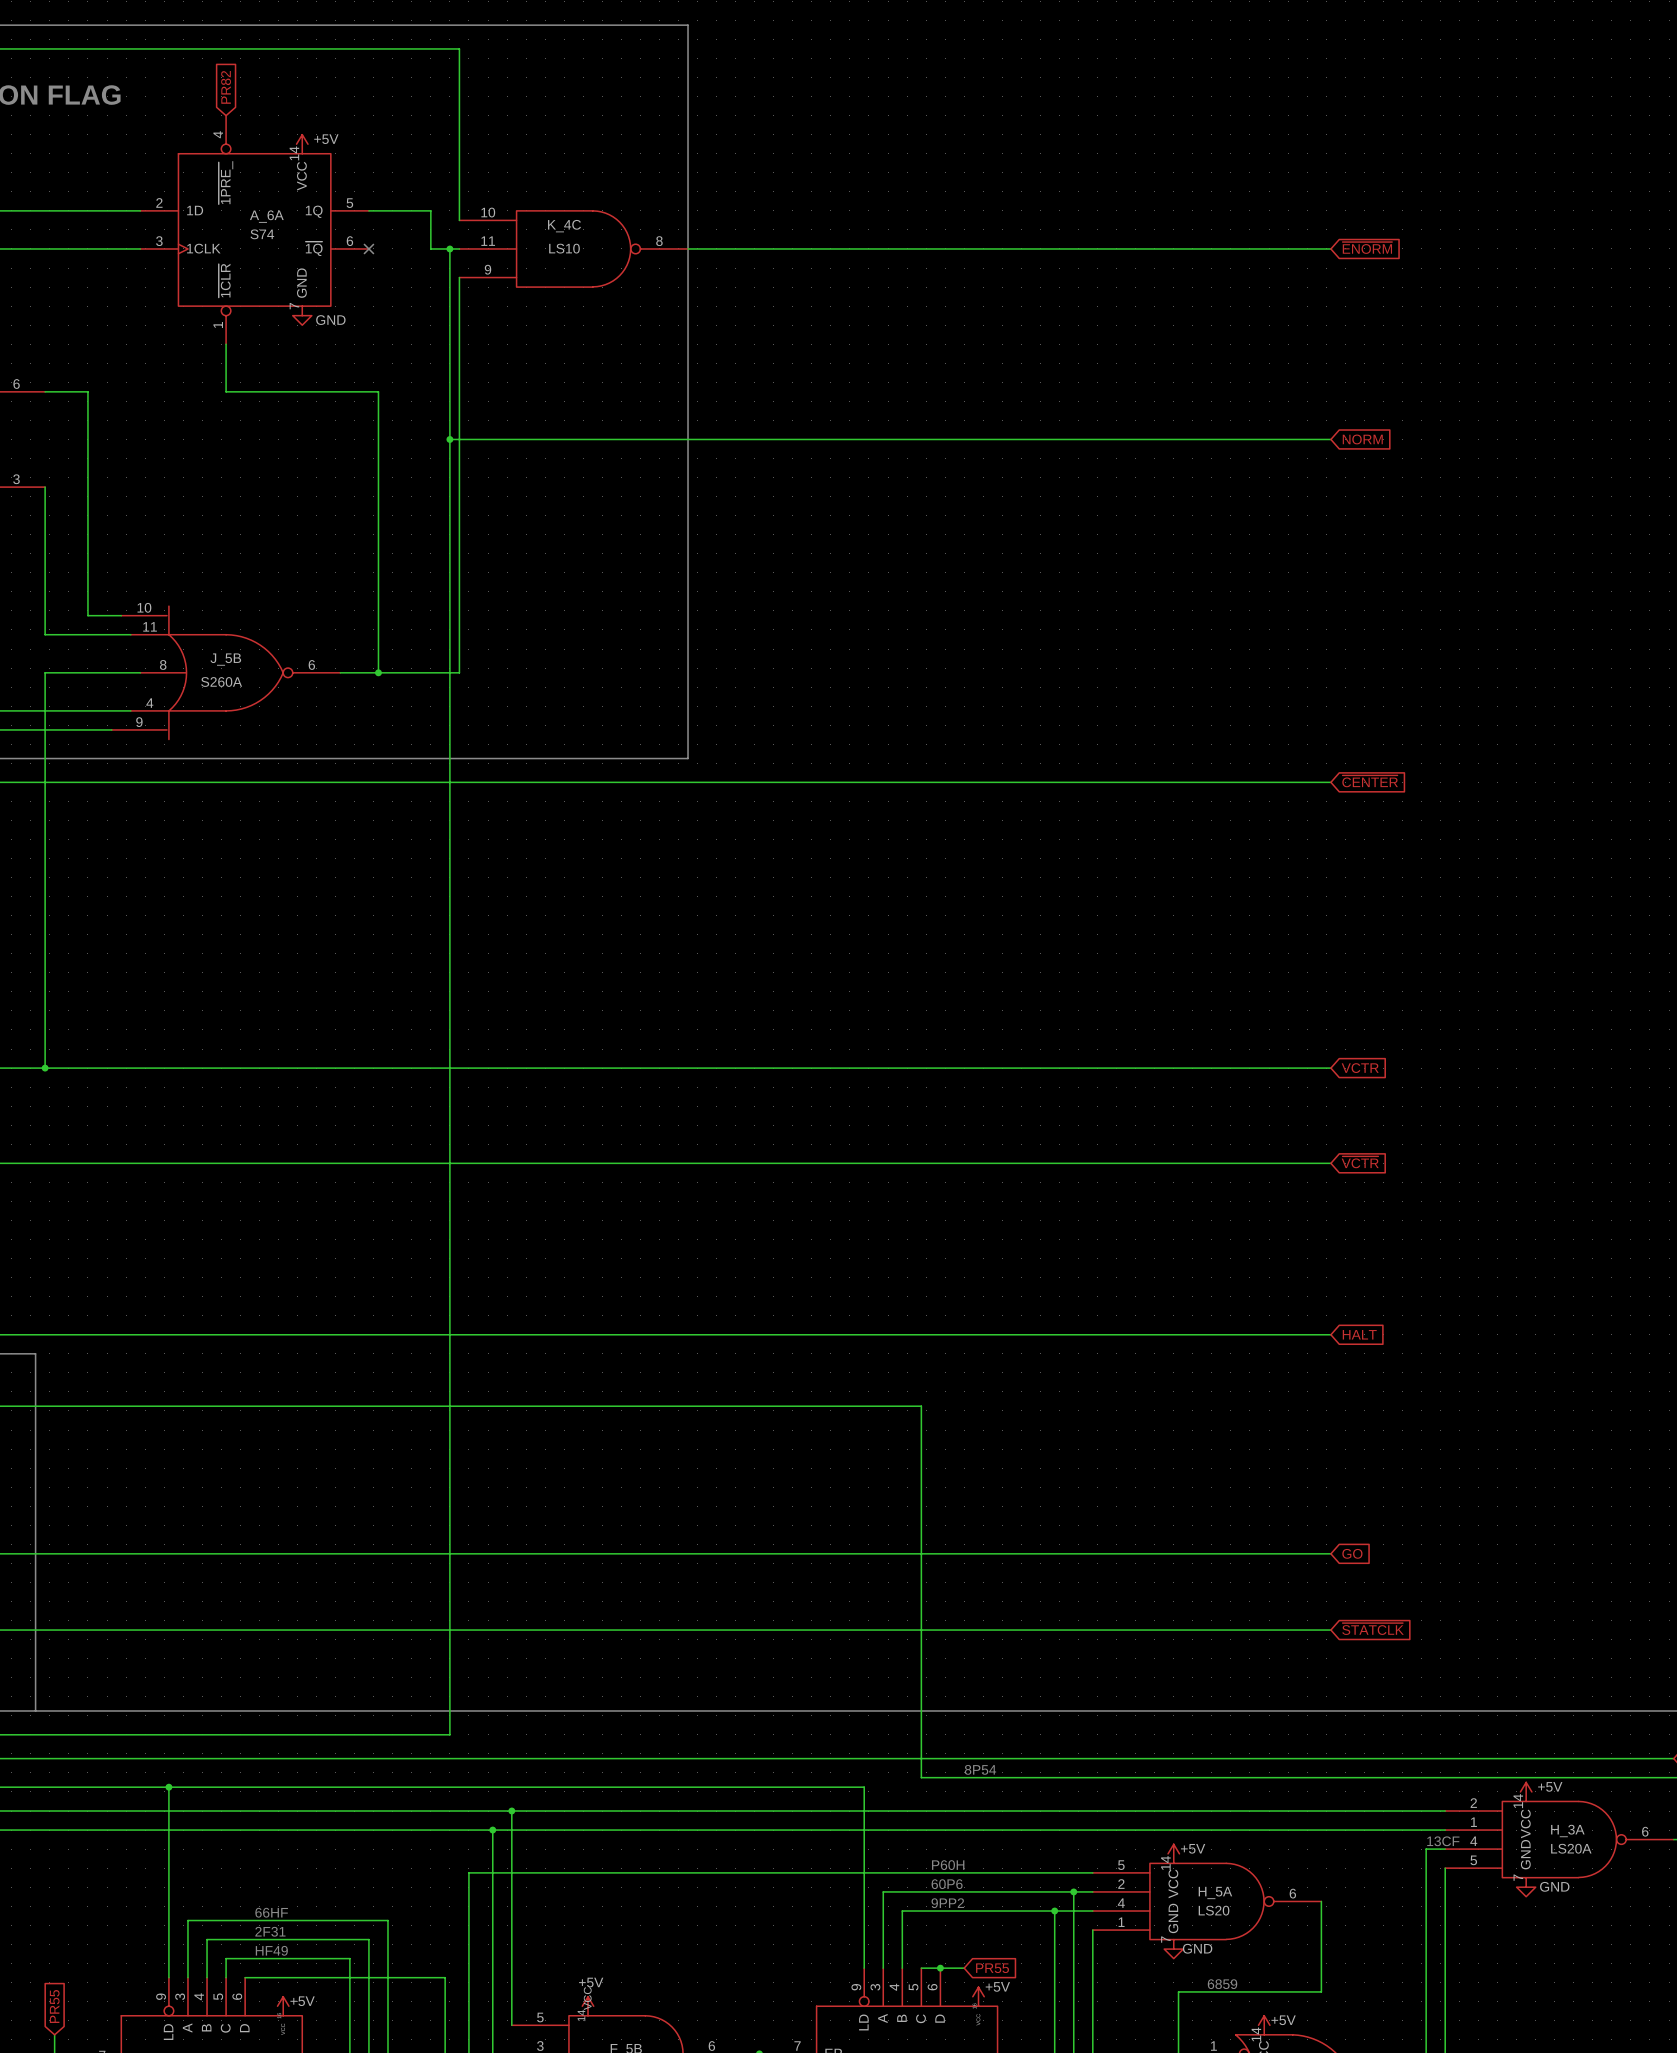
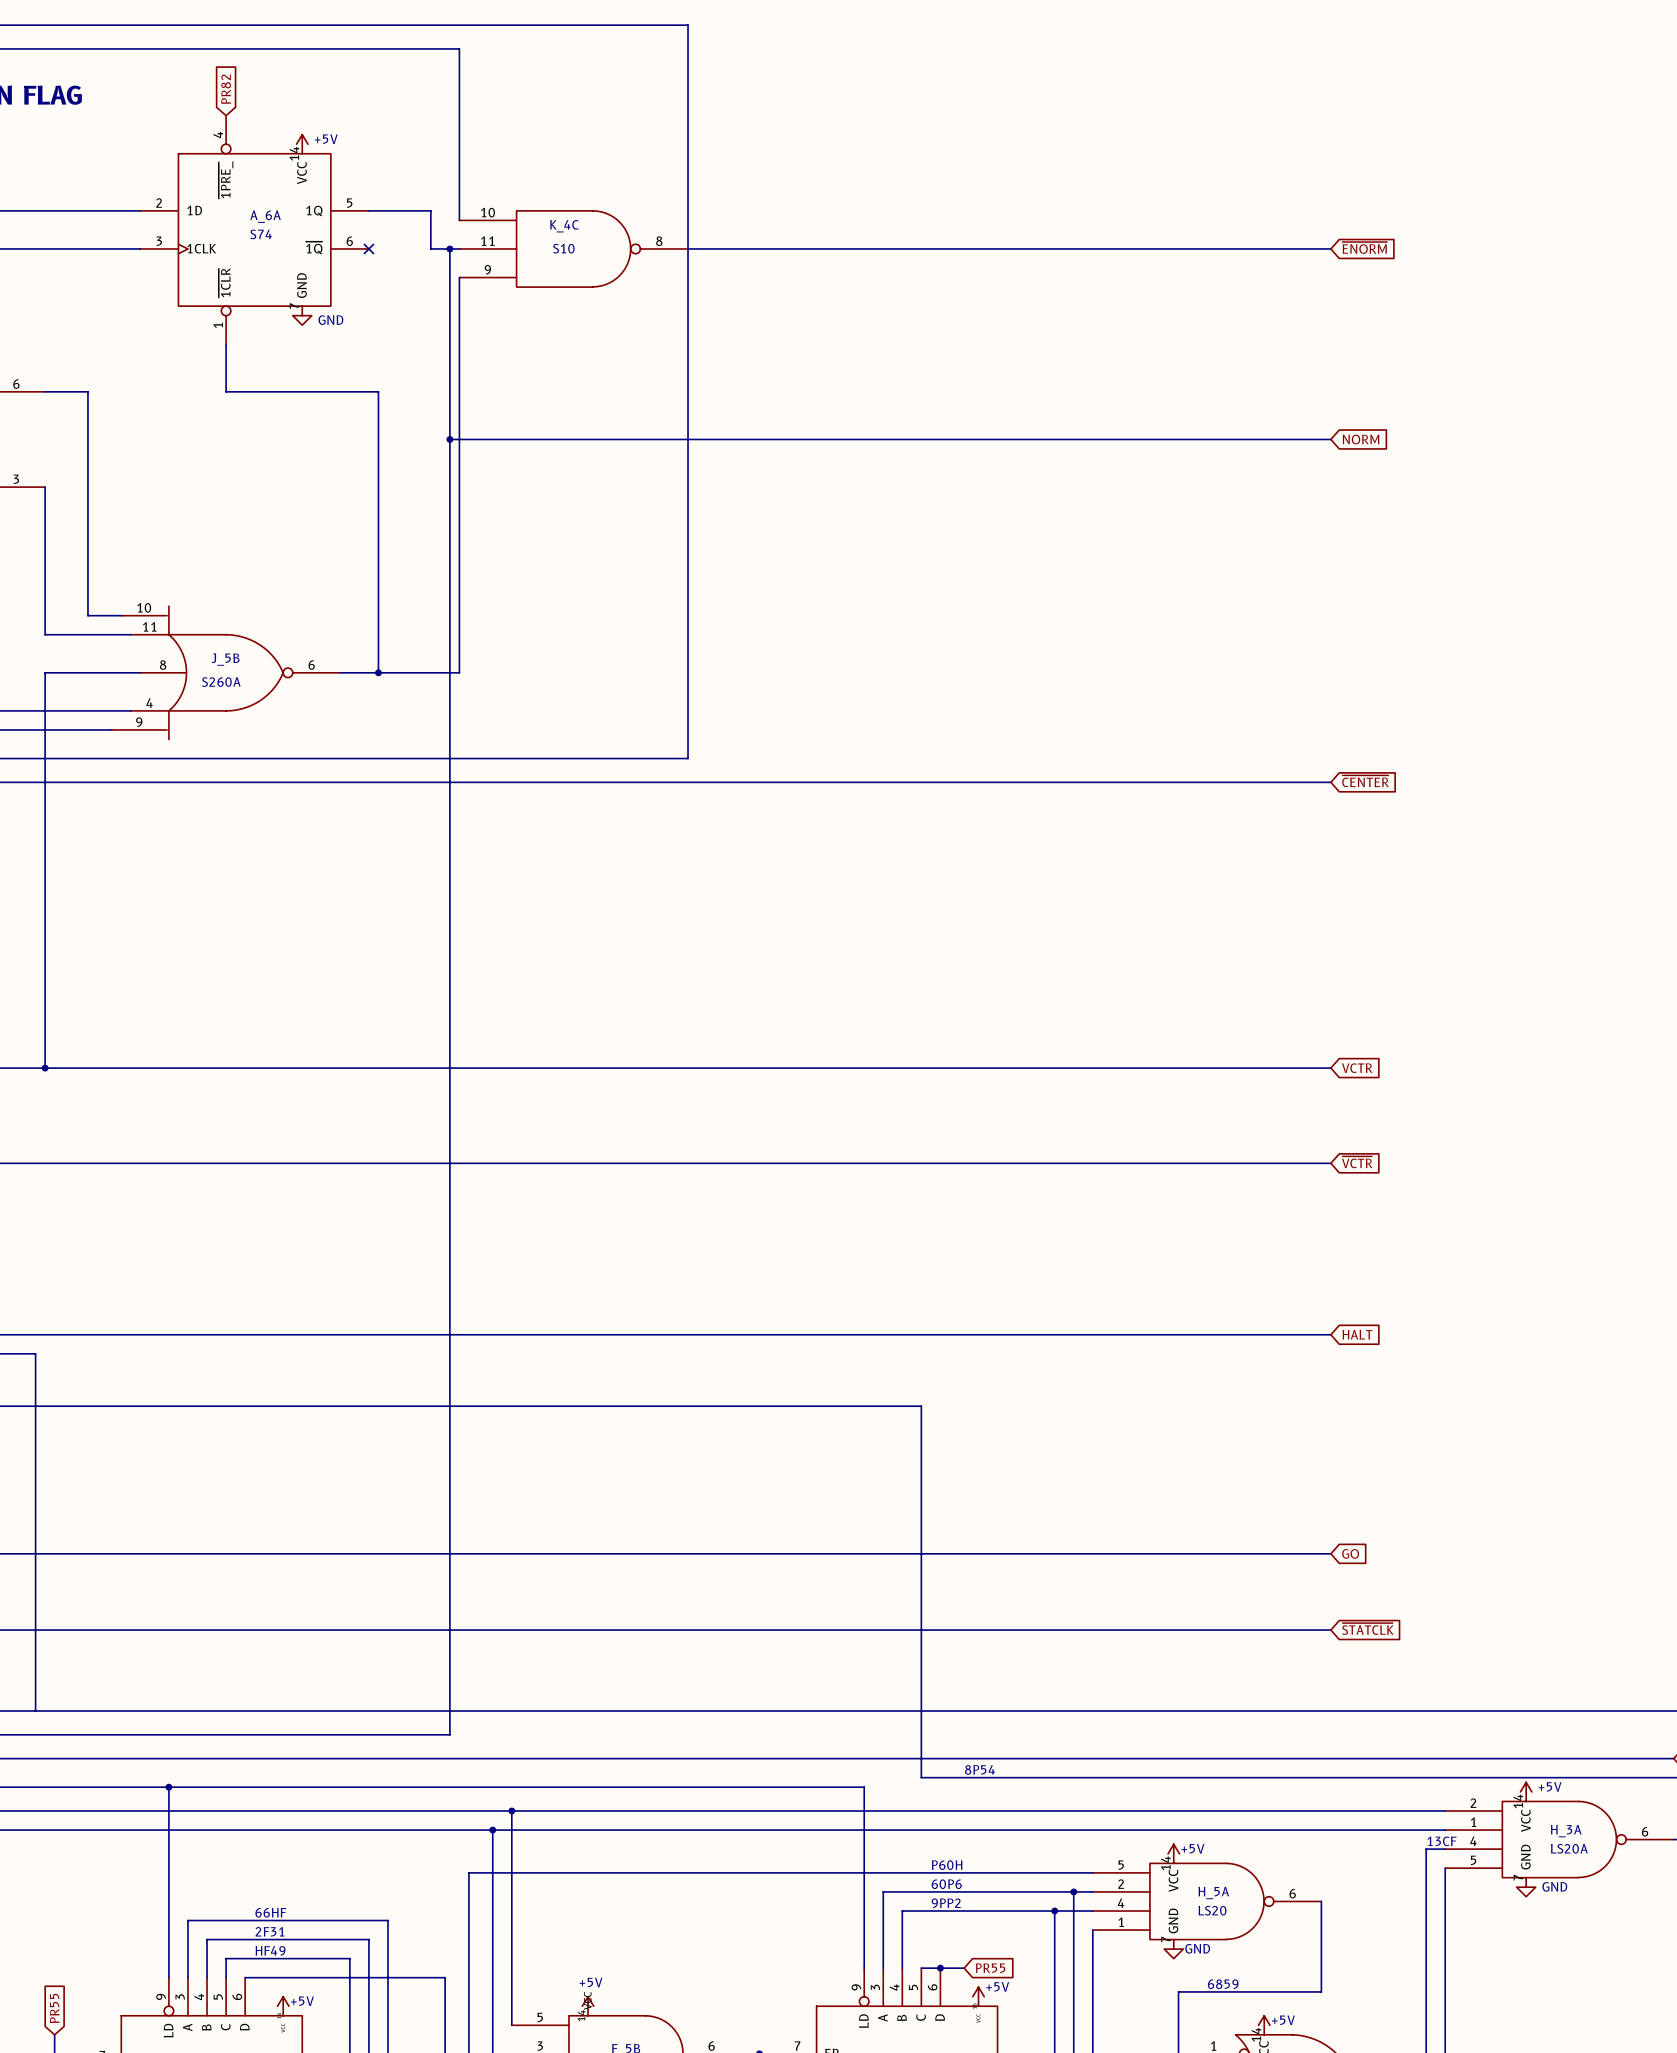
K_4C value: LS10 (564, 248) -> S10 (563, 248)

